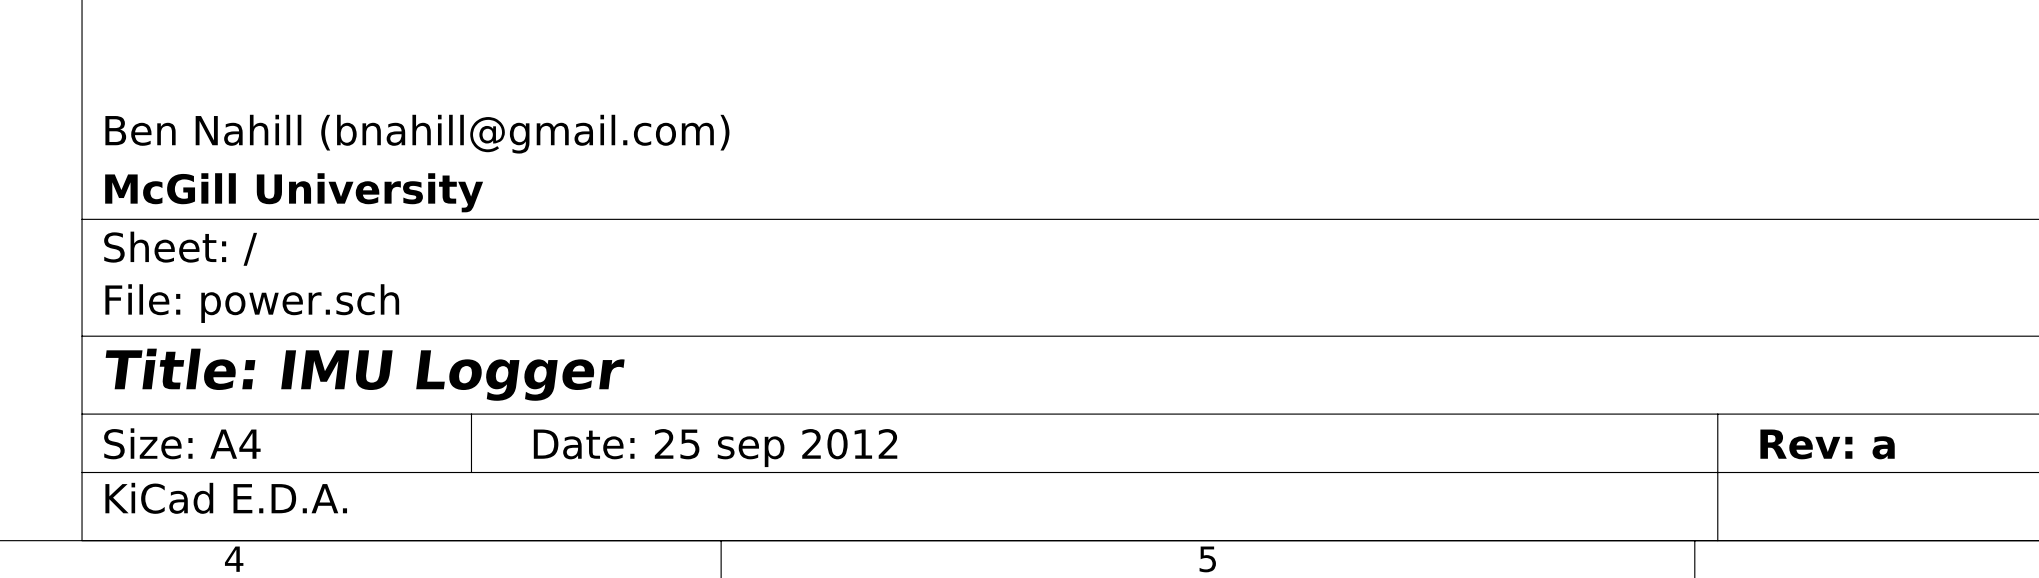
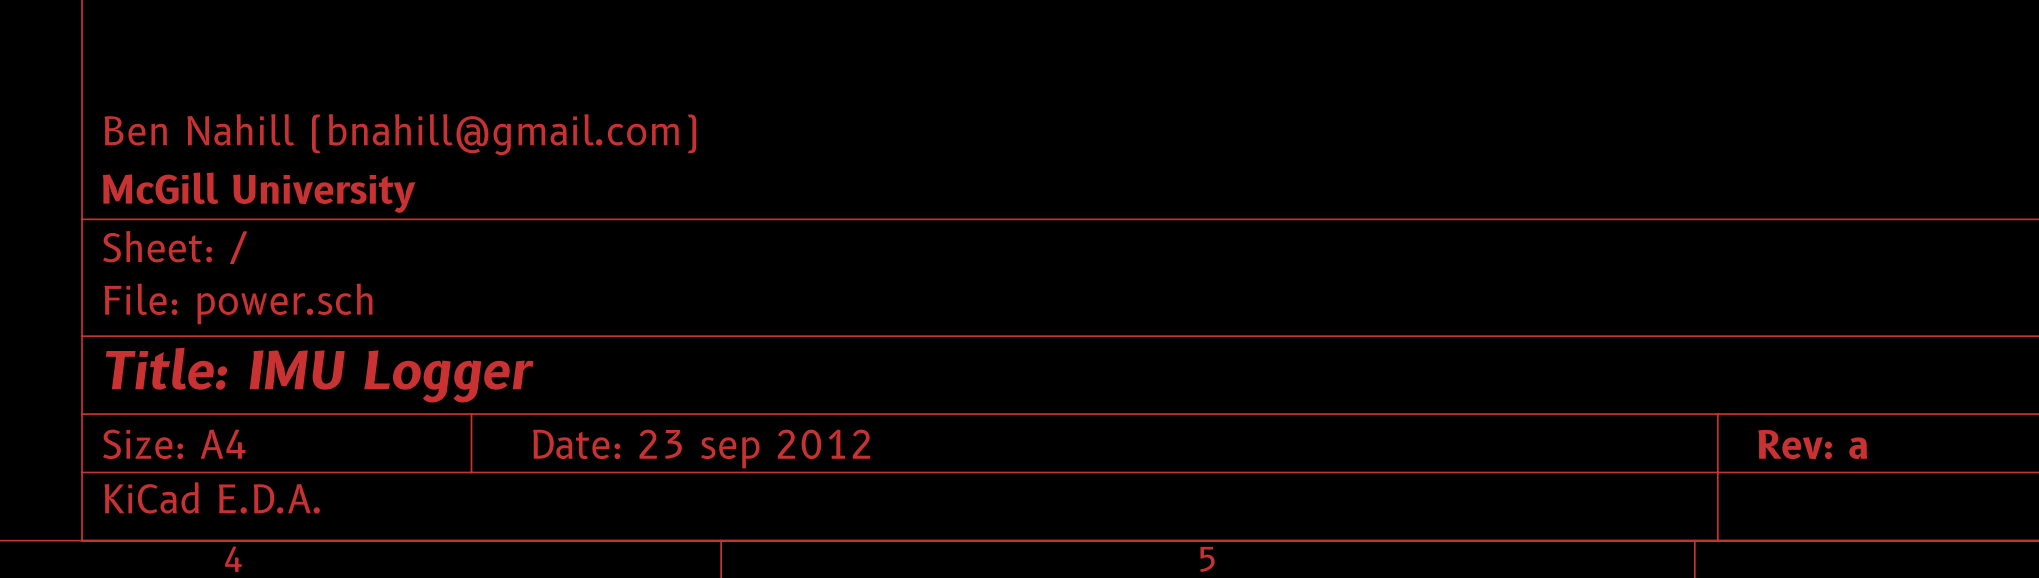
title block: Date: 25 sep 2012 (715, 448) -> Date: 23 sep 2012 (701, 448)

